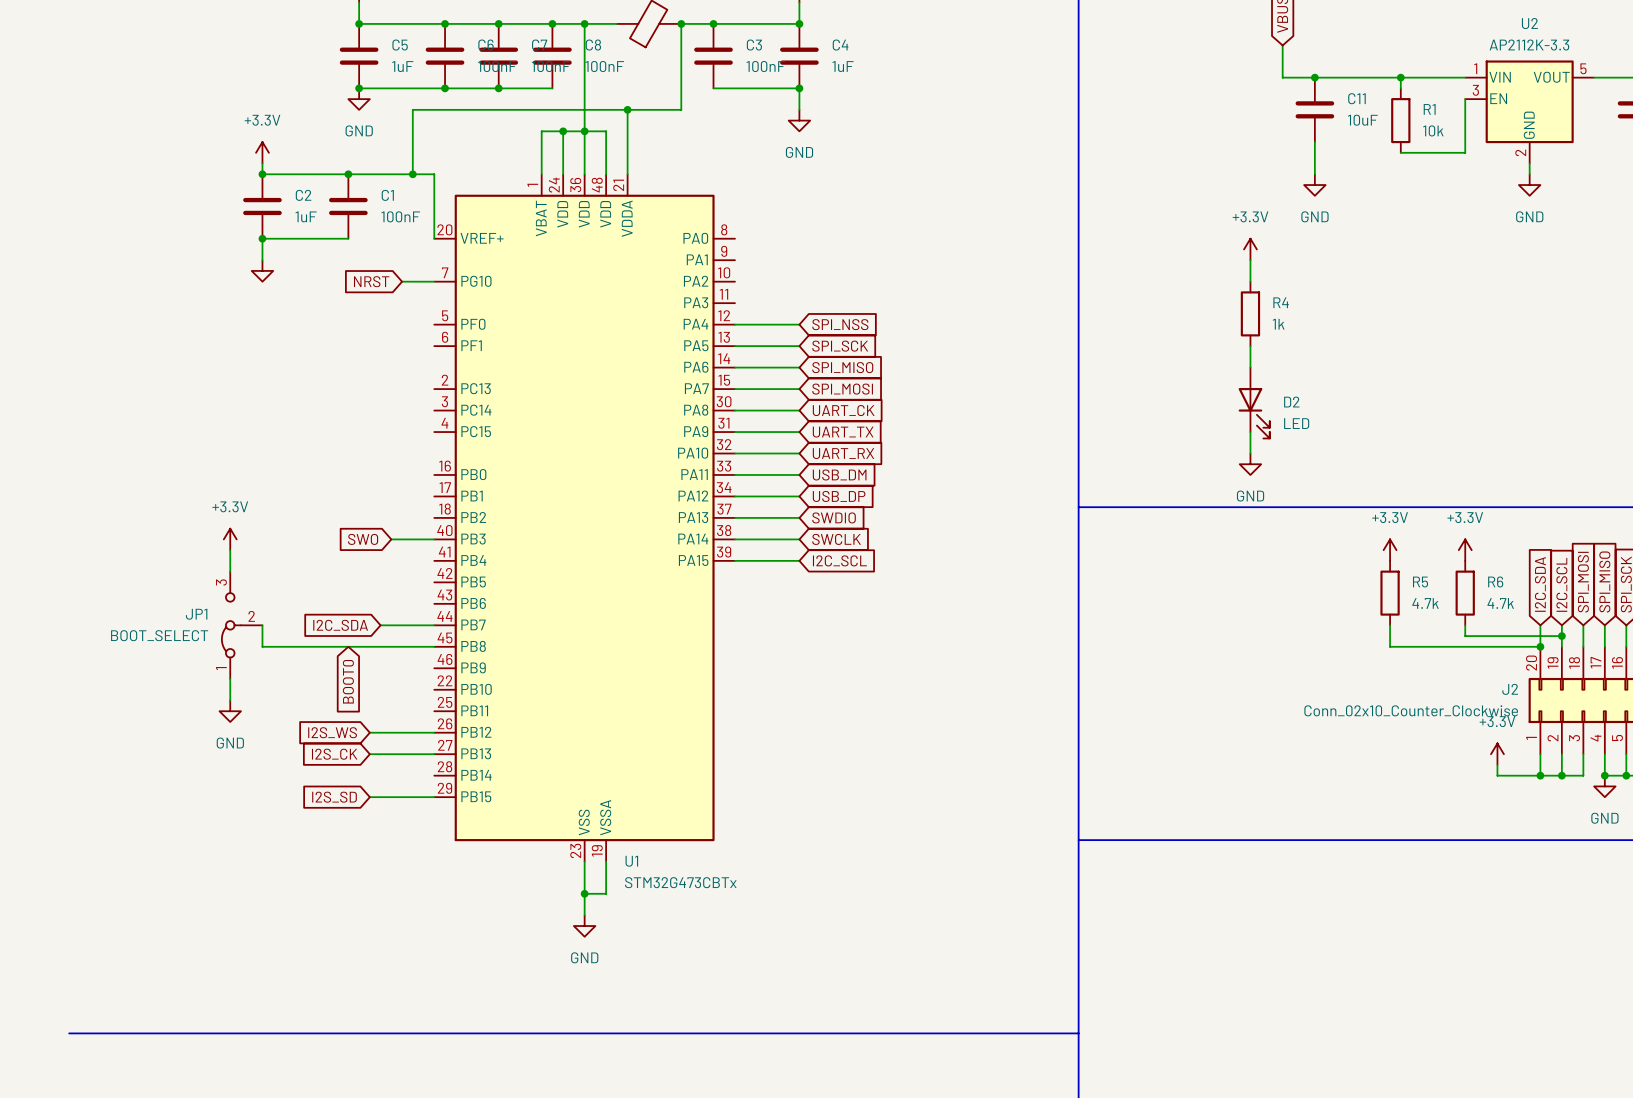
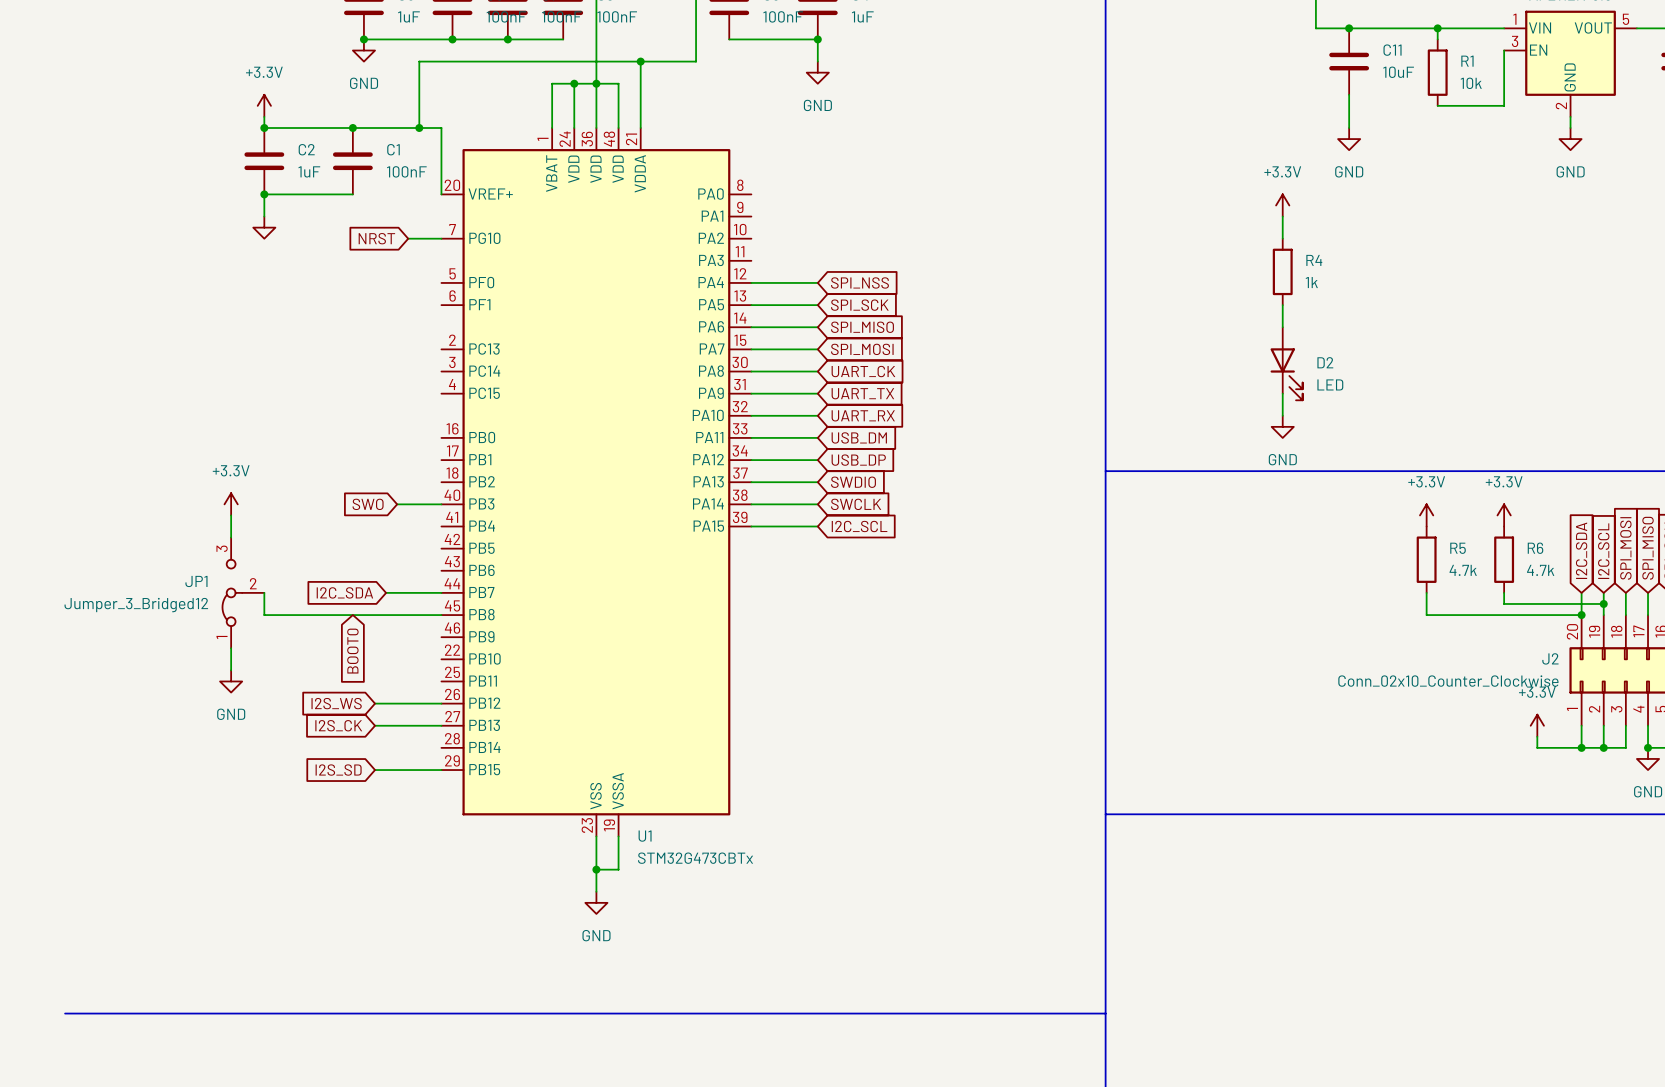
JP1 value: BOOT_SELECT (159, 635) -> Jumper_3_Bridged12 (136, 605)

